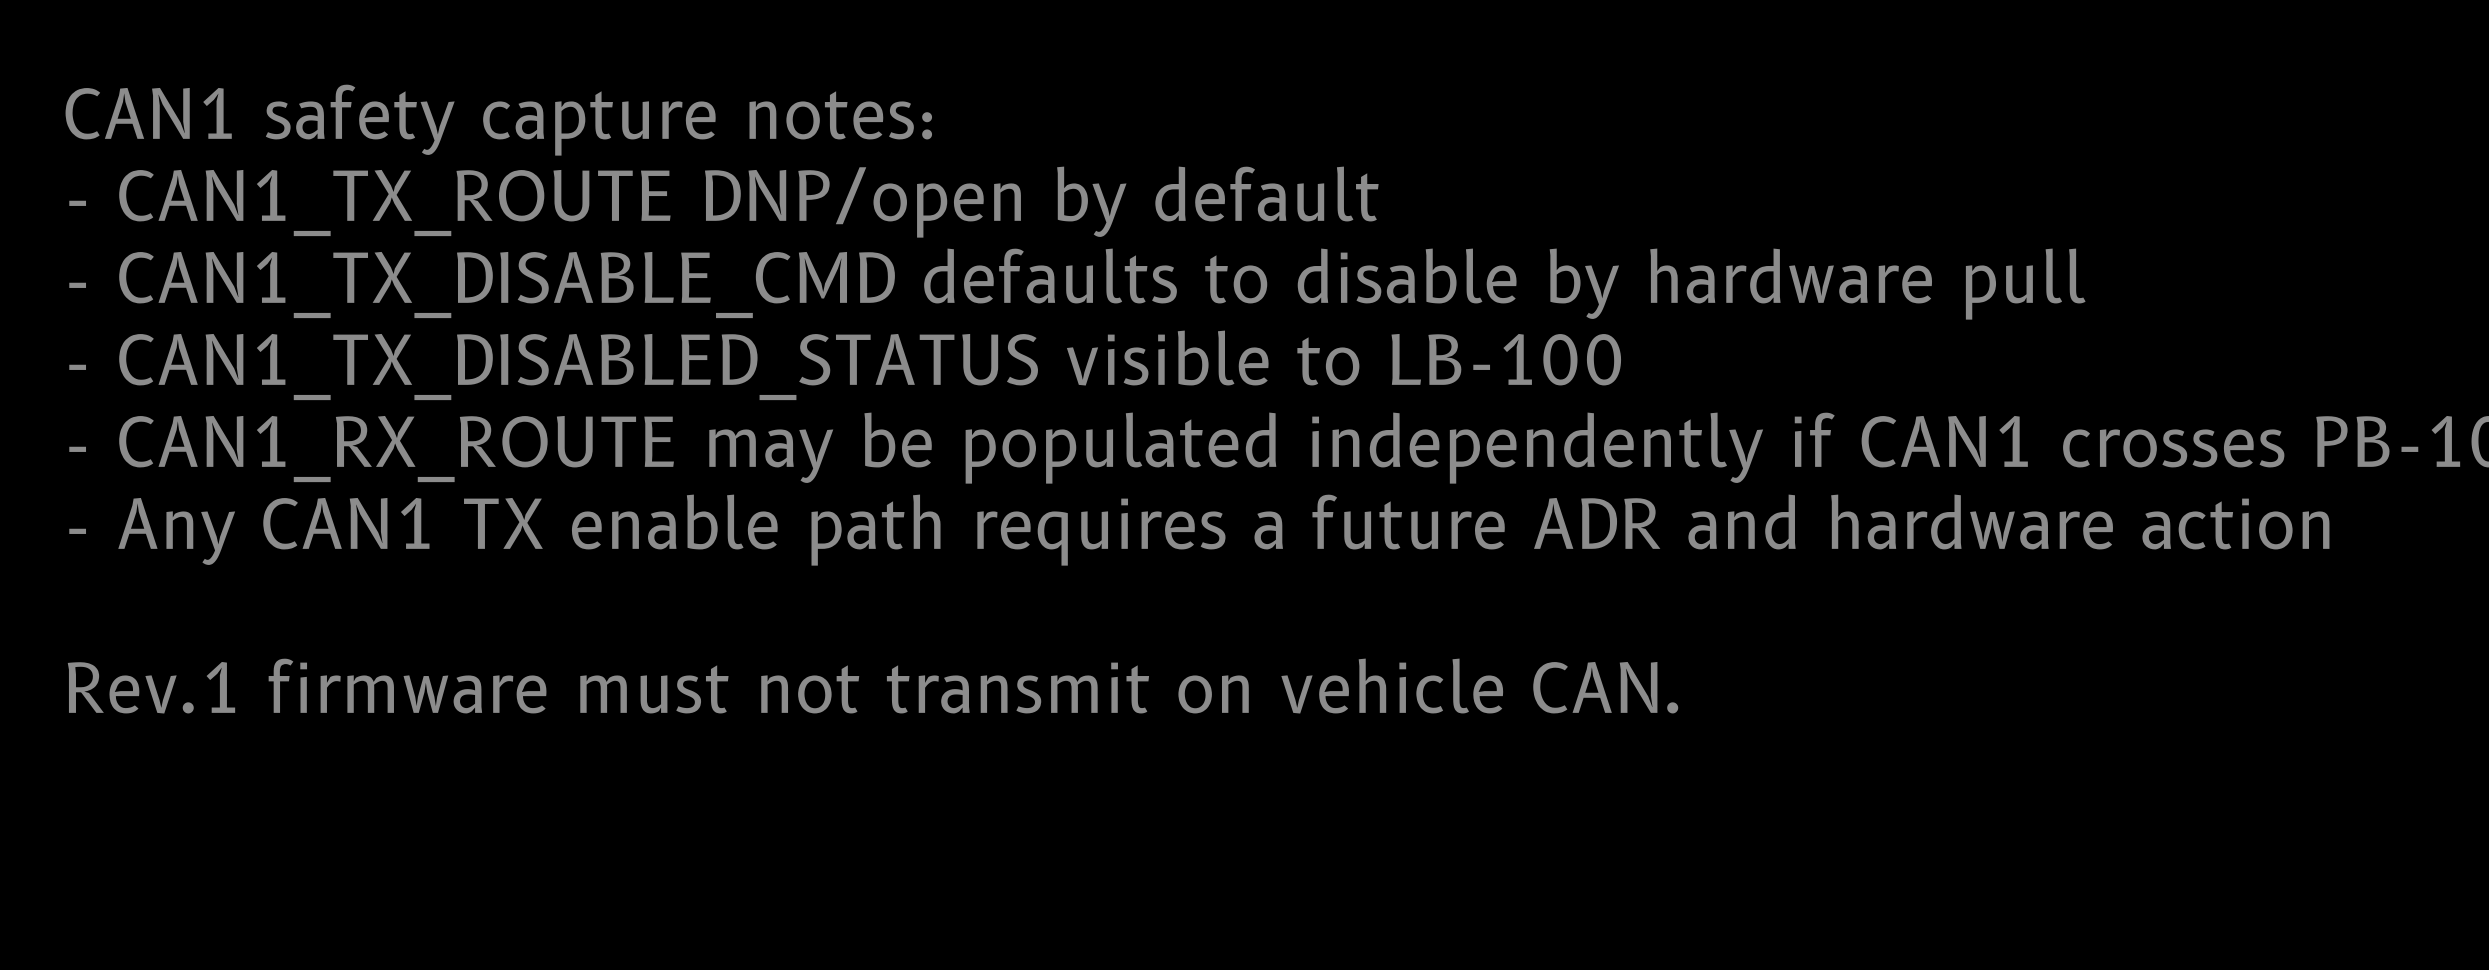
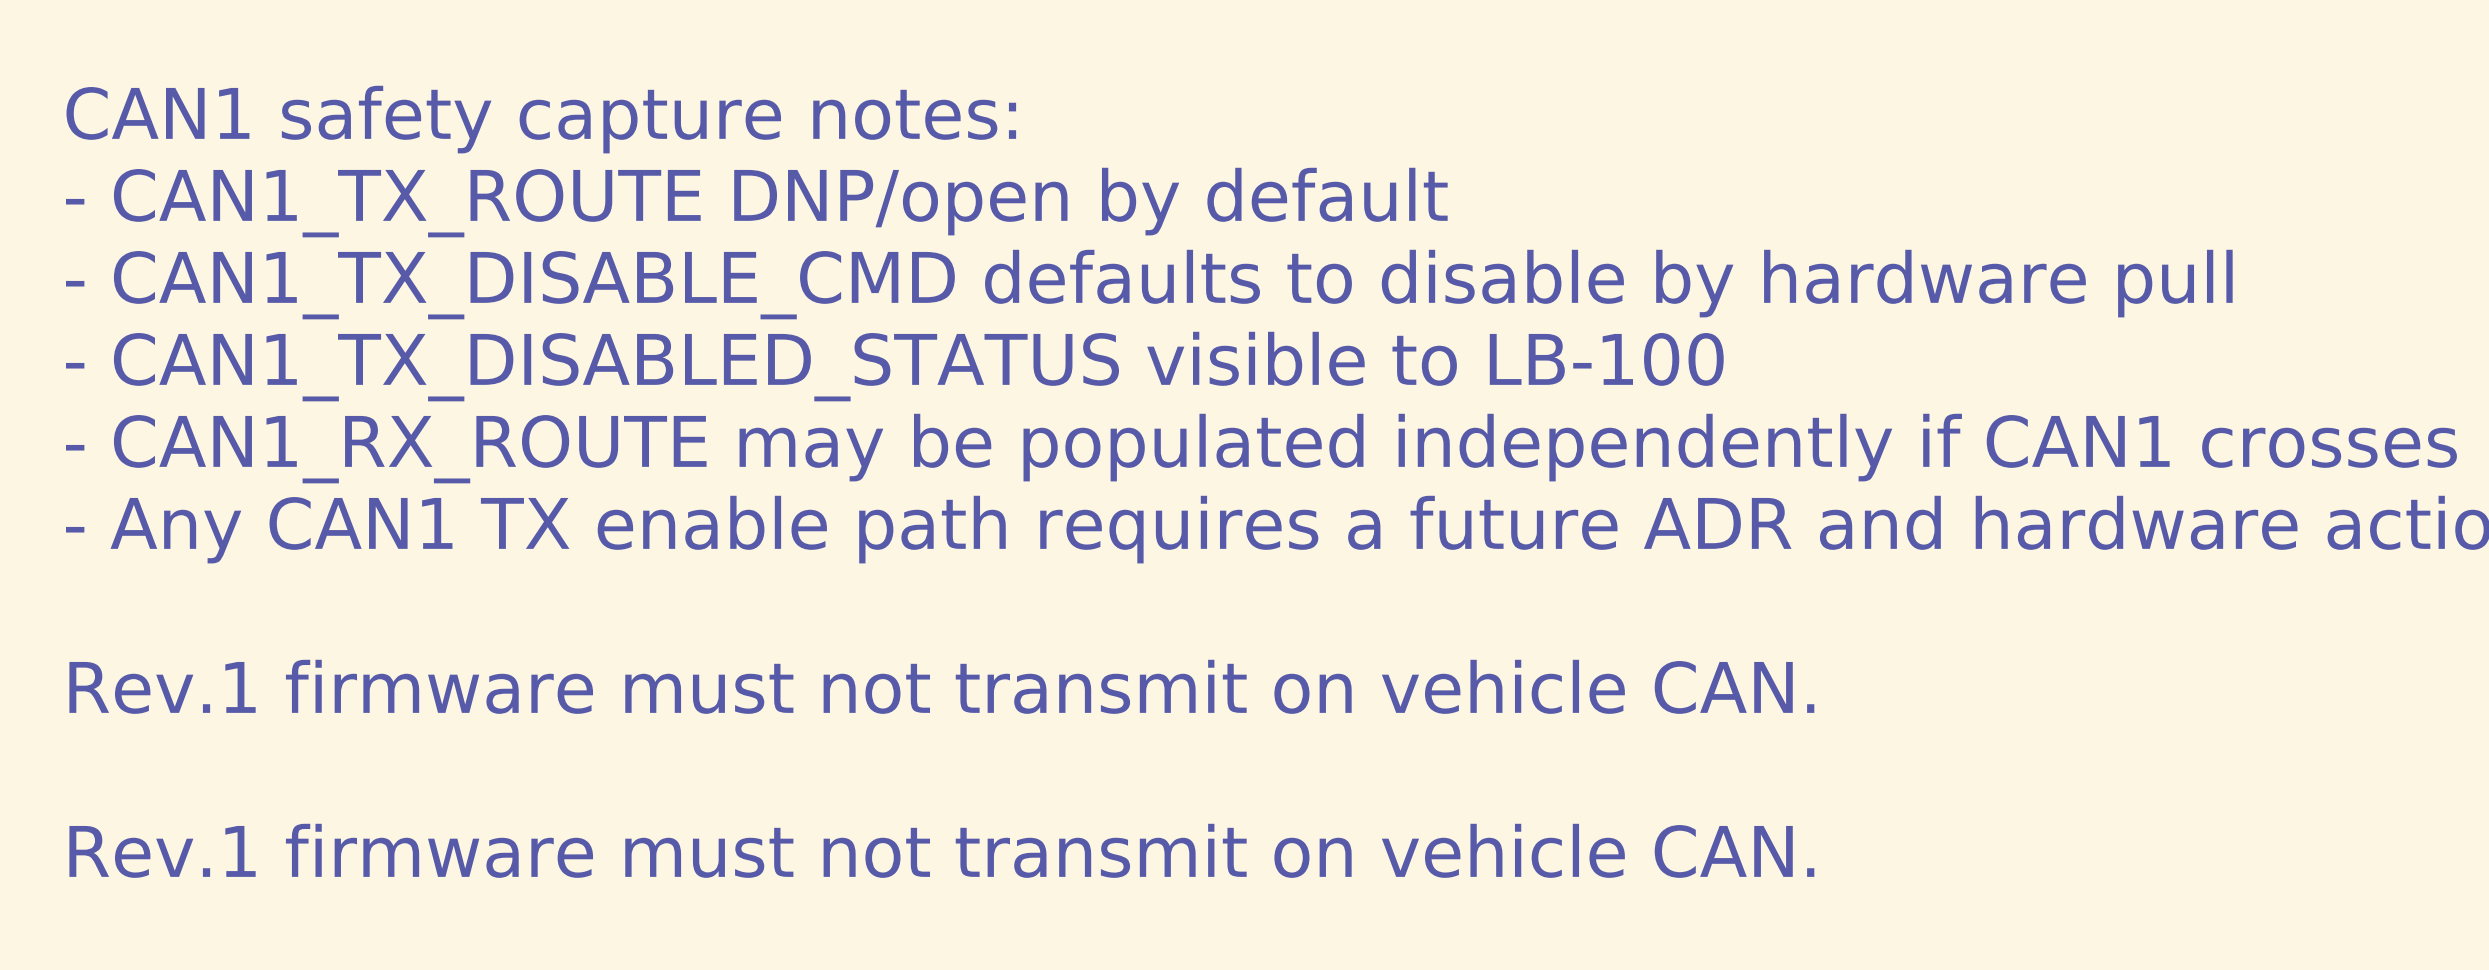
text: none -> Rev.1 firmware must not transmit on vehicle CAN. (941, 850)

